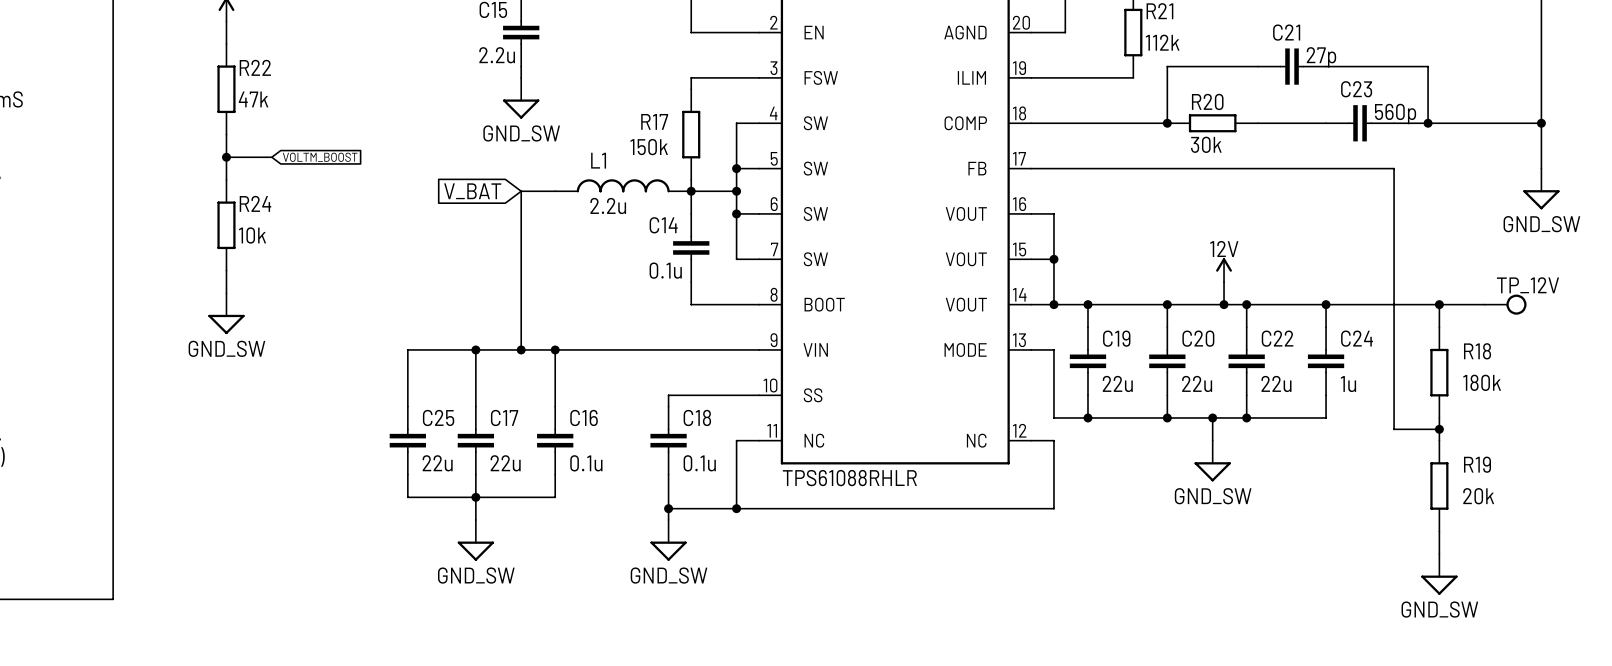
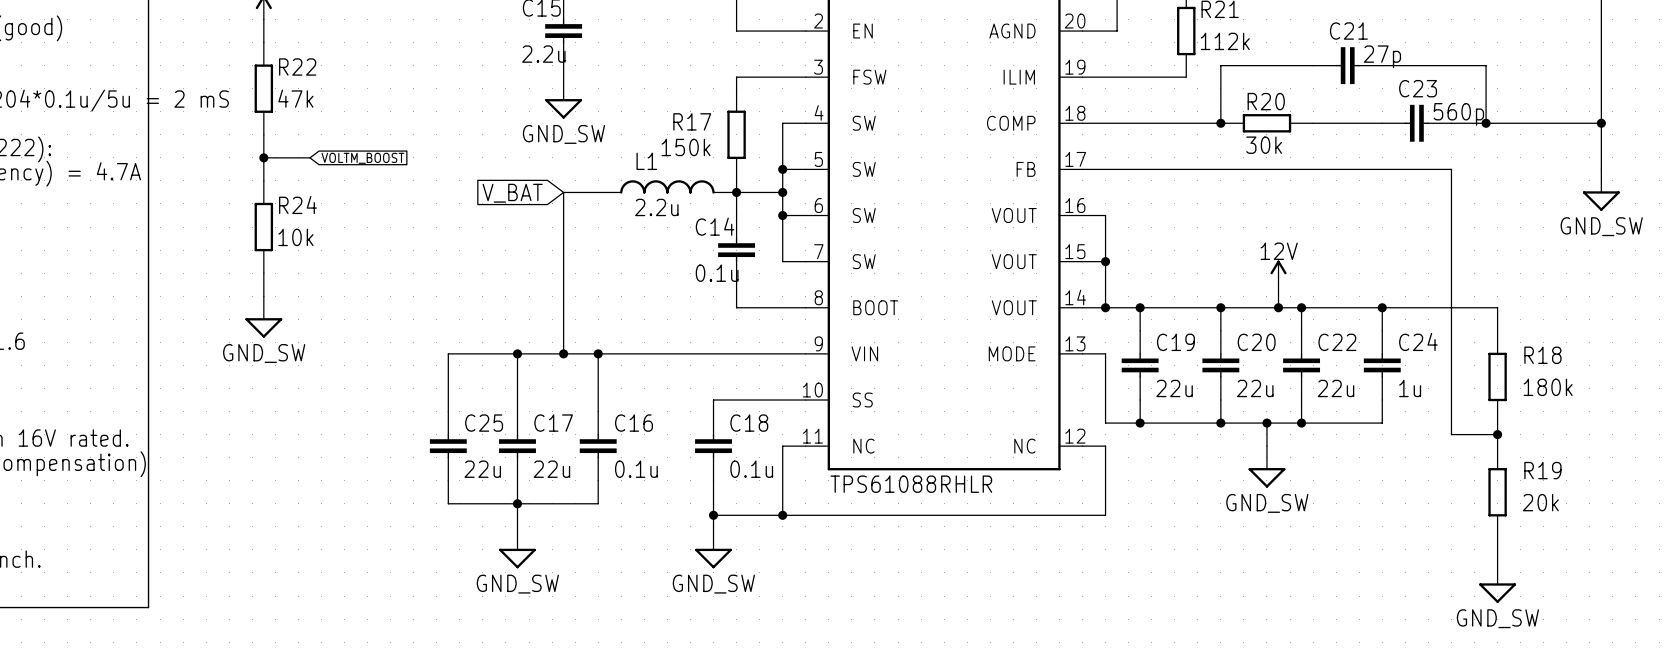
wire: (1439, 304) (1484, 304) -> none
junction: (1439, 304) -> none
TP_12V: (1505, 304) -> none

